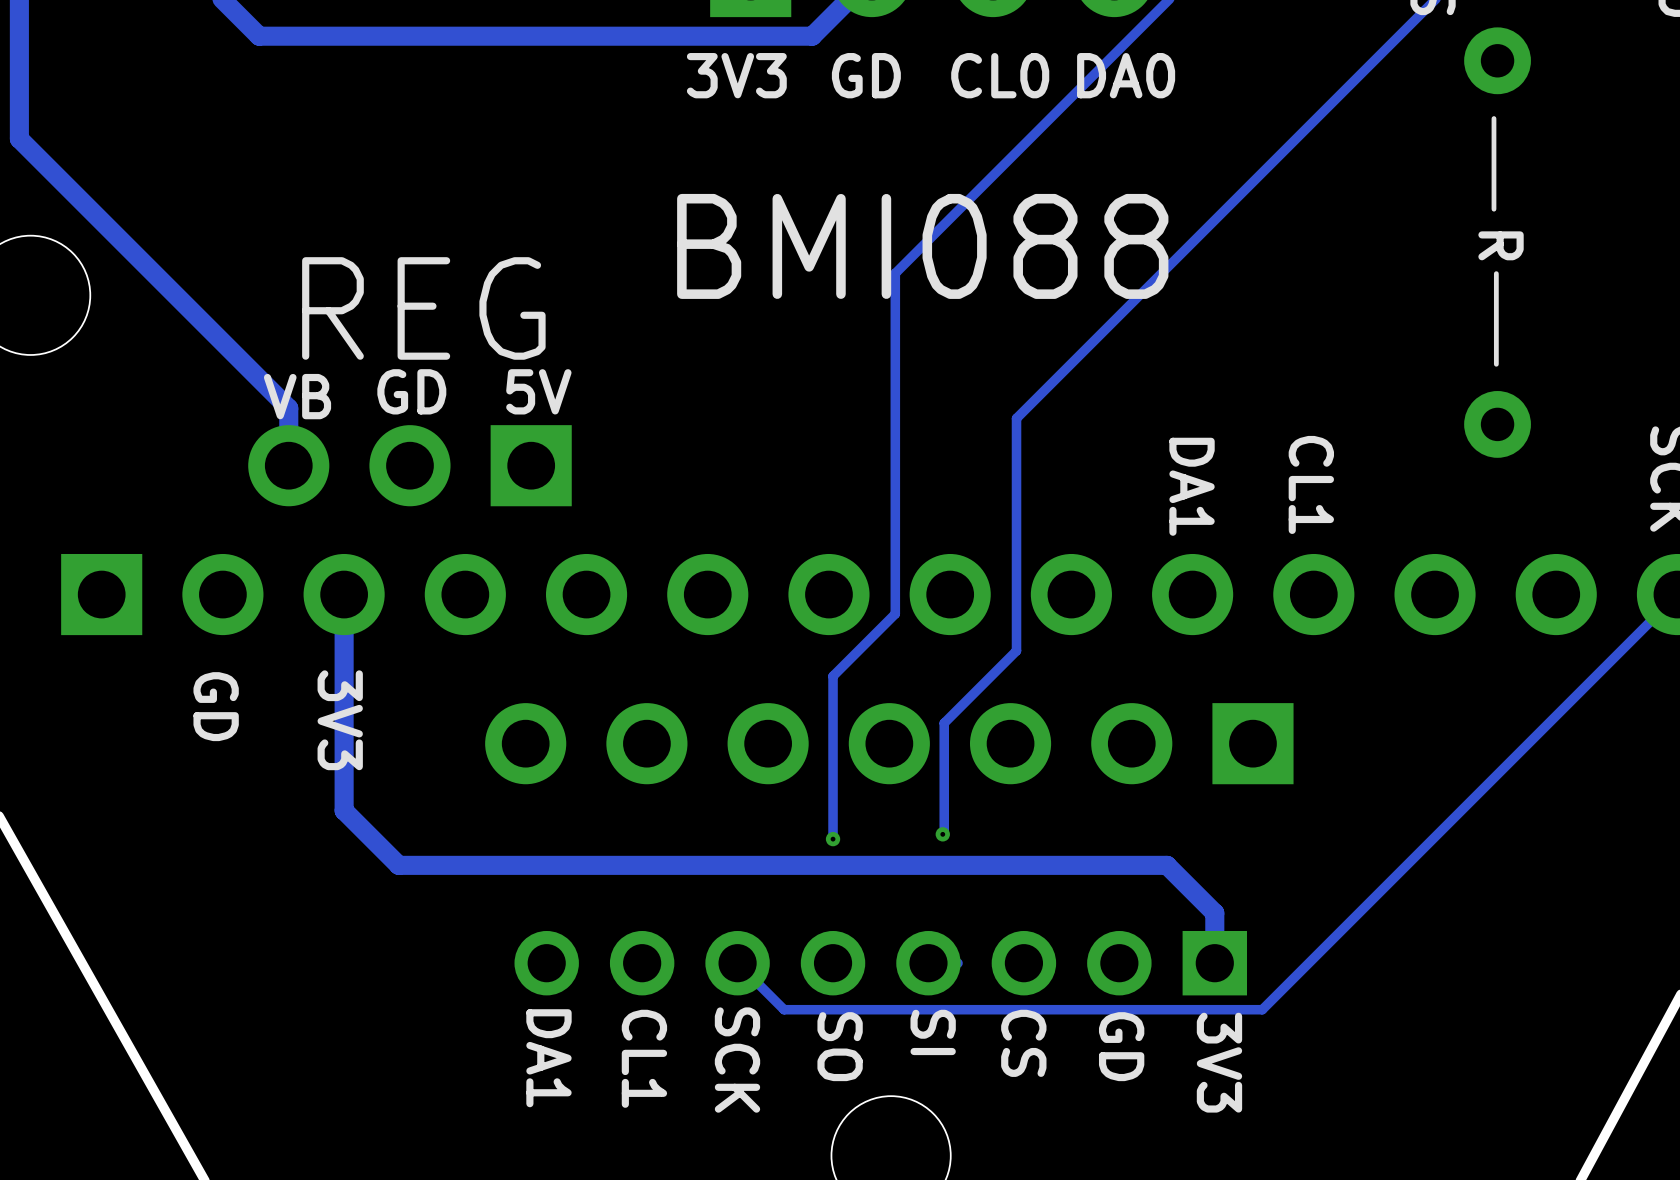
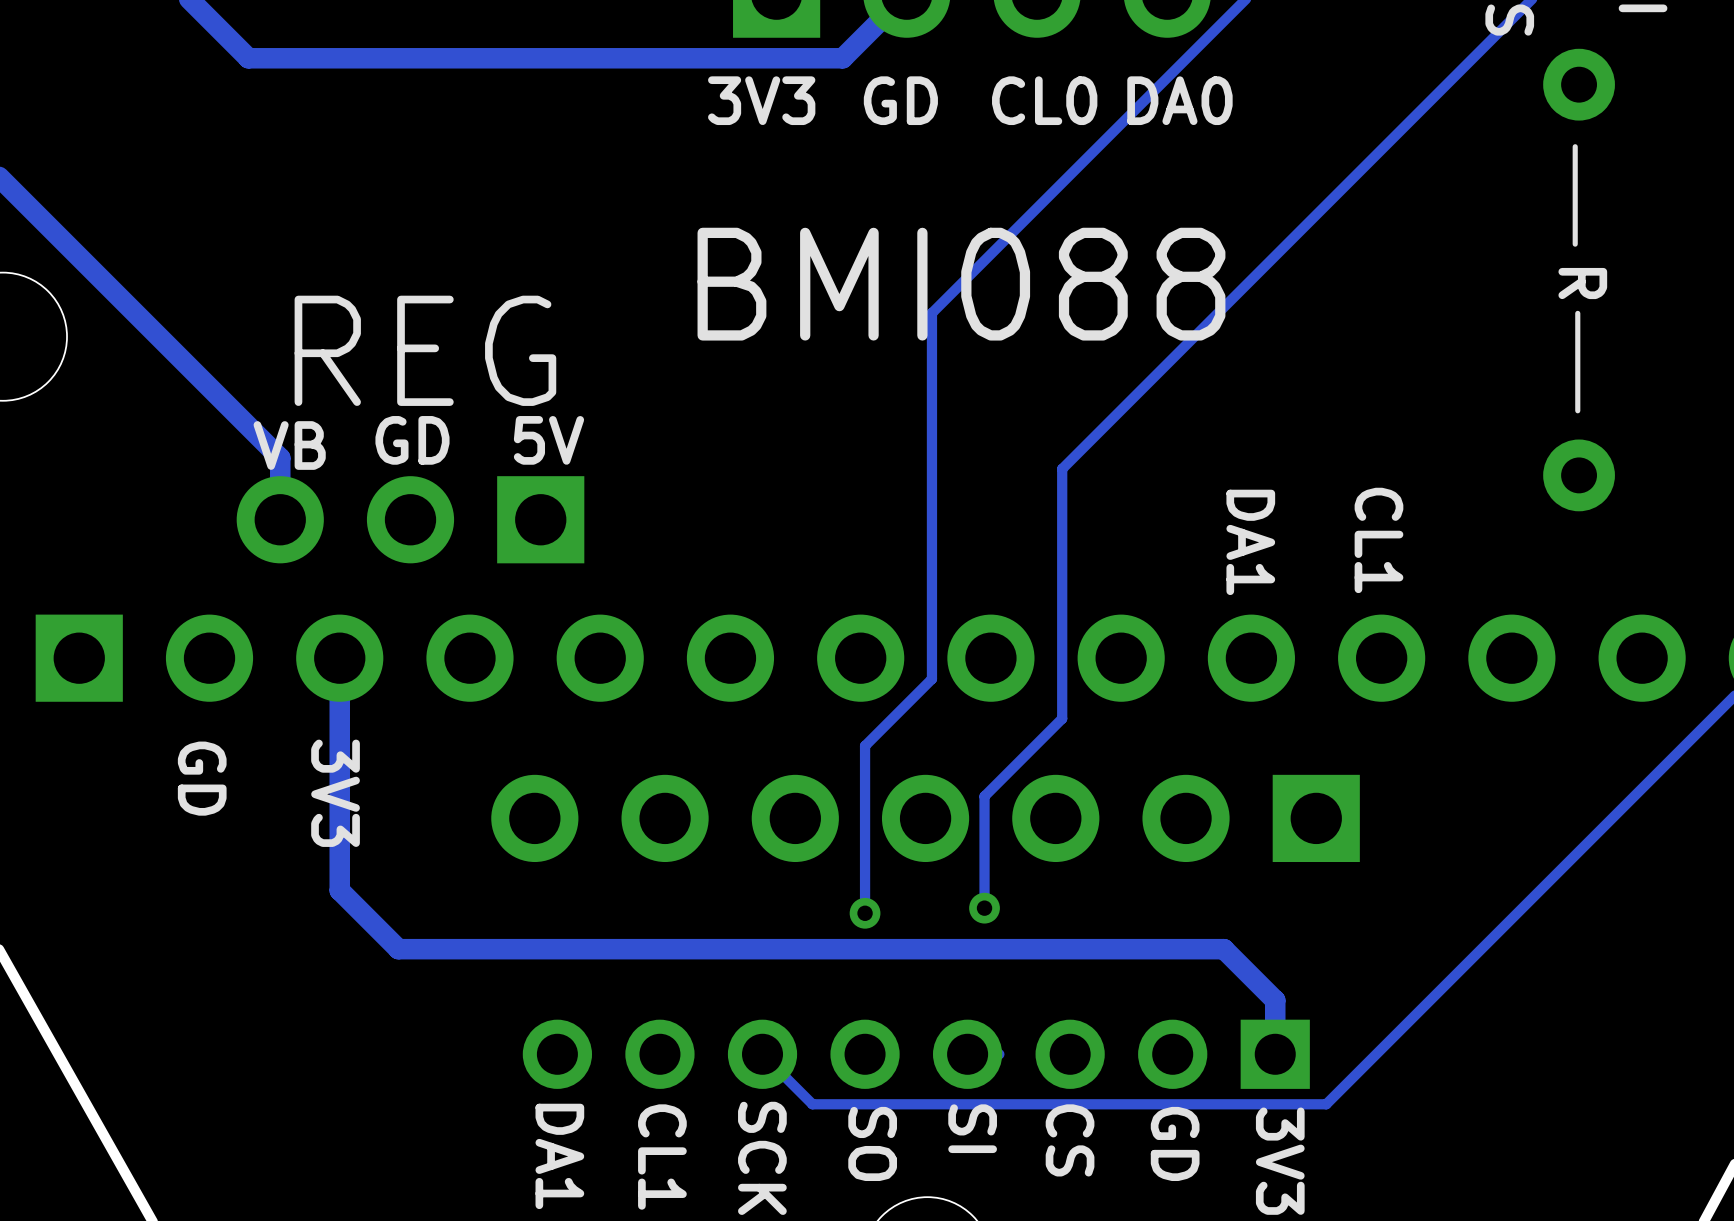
via size: [935, 827, 950, 842] -> [969, 892, 1000, 924]
via size: [825, 831, 841, 847] -> [849, 897, 881, 929]

